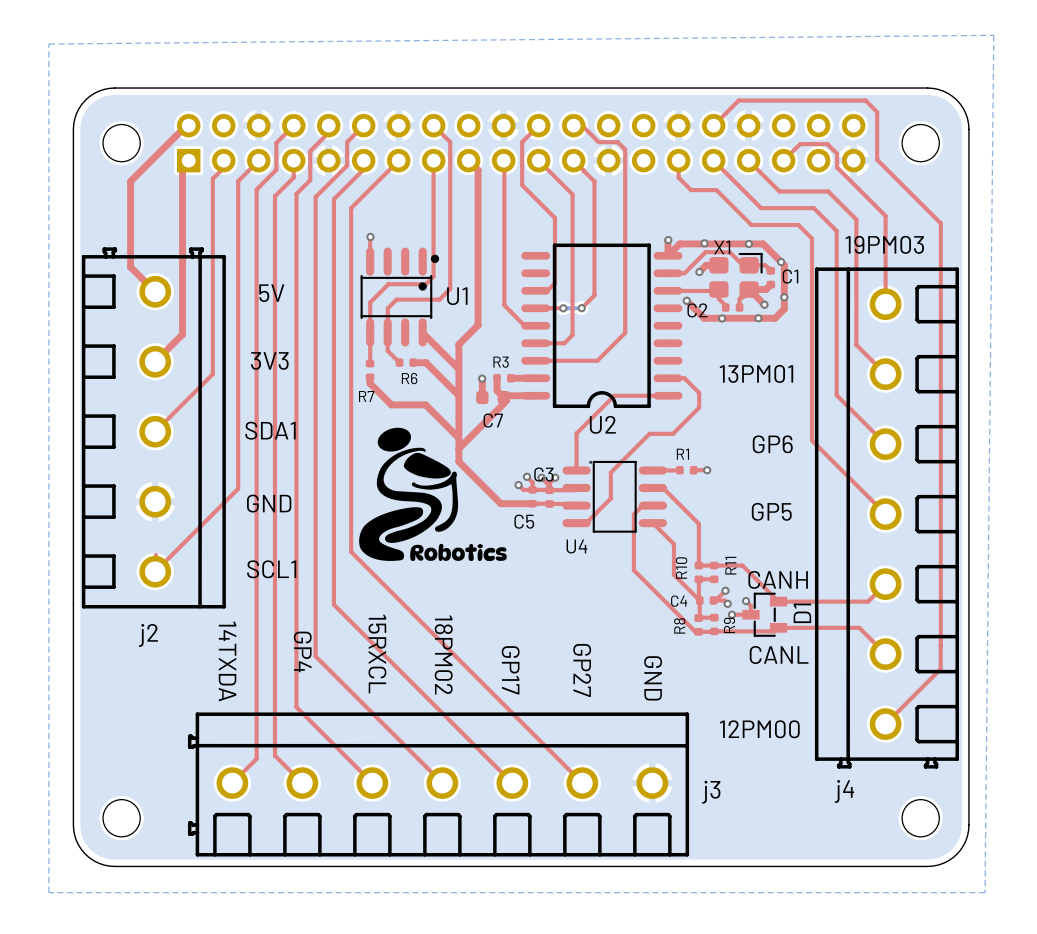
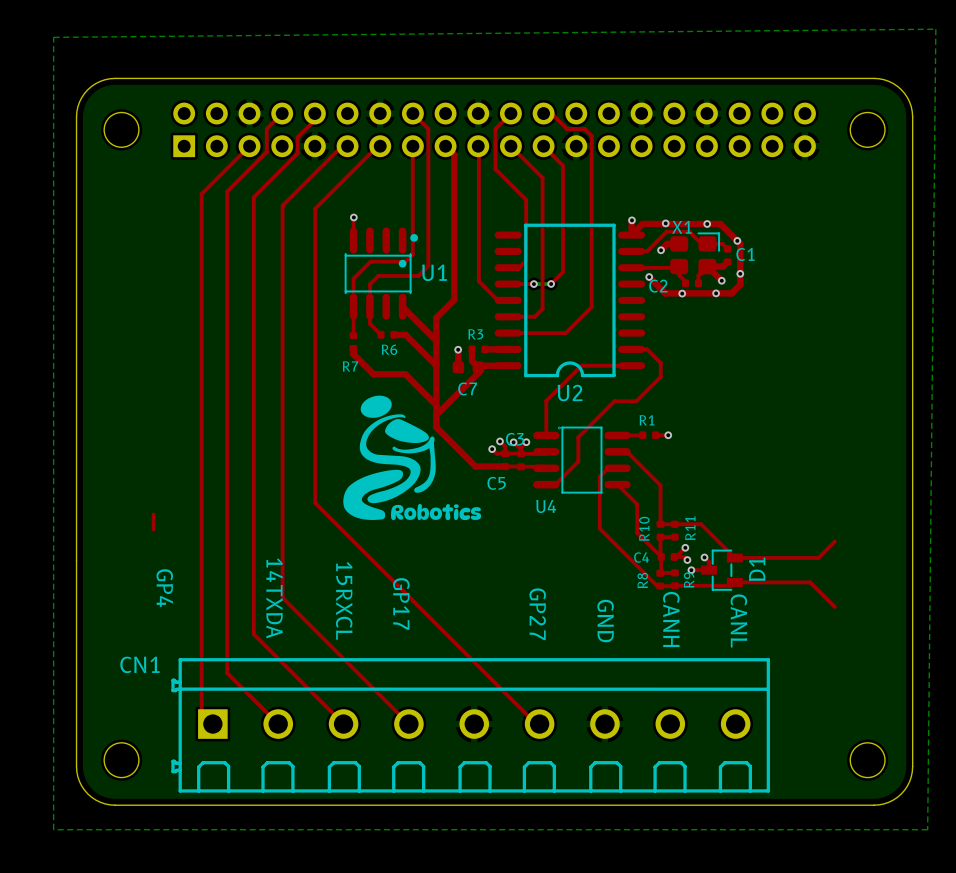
top track: (188, 125) (186, 125) (130, 181) (130, 267) (155, 291) -> none
top track: (363, 125) (347, 142) (347, 165) (315, 197) (315, 656) (442, 783) -> none
top track: (713, 125) (738, 100) (865, 100) (877, 112) (877, 159) (940, 223) (940, 645) -> none
top track: (277, 142) (276, 169) (256, 189) (256, 758) (232, 783) -> (266, 128) (266, 152) (227, 191) (227, 673) (278, 724)
top track: (188, 160) (182, 166) (182, 334) (155, 361) -> none
top track: (223, 160) (223, 167) (212, 178) (212, 374) (155, 431) -> none
top track: (293, 160) (293, 177) (274, 196) (274, 755) (302, 783) -> none
top track: (363, 160) (363, 169) (333, 199) (333, 604) (512, 783) -> (347, 146) (342, 146) (282, 205) (282, 597) (410, 725)
top track: (398, 160) (351, 208) (351, 551) (582, 783) -> (380, 146) (377, 146) (315, 208) (315, 503) (537, 725)
top track: (678, 160) (678, 177) (691, 190) (716, 190) (751, 224) (798, 224) (812, 238) (812, 440) (885, 514) -> none
top track: (713, 160) (761, 208) (813, 208) (836, 231) (836, 395) (885, 444) -> none
top track: (748, 160) (779, 191) (828, 191) (856, 219) (856, 344) (885, 374) -> none
top track: (783, 160) (800, 144) (827, 144) (837, 153) (837, 167) (885, 215) (885, 304) -> none
top track: (310, 168) (310, 180) (296, 193) (296, 707) (372, 783) -> (297, 153) (253, 197) (253, 634) (345, 725)
top track: (238, 181) (238, 488) (155, 571) -> (230, 165) (201, 194) (201, 712) (214, 725)
text: 19PM03 (884, 244) -> none
text: 5V (271, 293) -> none
text: 3V3 (269, 360) -> none
text: 13PM01 (756, 373) -> none
j2: (153, 427) -> none
text: SDA1 (270, 430) -> none
text: GP6 (772, 444) -> none
text: GND (269, 503) -> none
text: GP5 (771, 511) -> none
j4: (886, 518) -> none
text: SCL1 (271, 569) -> none
text rotation: 0° (778, 579) -> 90° clockwise (671, 619)
text position: CANH (778, 579) -> CANH (671, 619)
top track: (940, 645) (940, 669) (885, 724) -> none
text position: GP4 (302, 651) -> GP4 (164, 588)
text position: 15RXCL (377, 654) -> 15RXCL (344, 600)
text: 18PM02 (443, 654) -> none
text rotation: 0° (779, 655) -> 90° clockwise (738, 621)
text position: 14TXDA (227, 661) -> 14TXDA (274, 598)
text position: GP17 (510, 670) -> GP17 (401, 603)
text position: GP27 (582, 670) -> GP27 (537, 614)
text position: GND (653, 678) -> GND (605, 621)
text: 12PM00 (759, 729) -> none
CN1: none -> (470, 725)
j3: (438, 784) -> none

